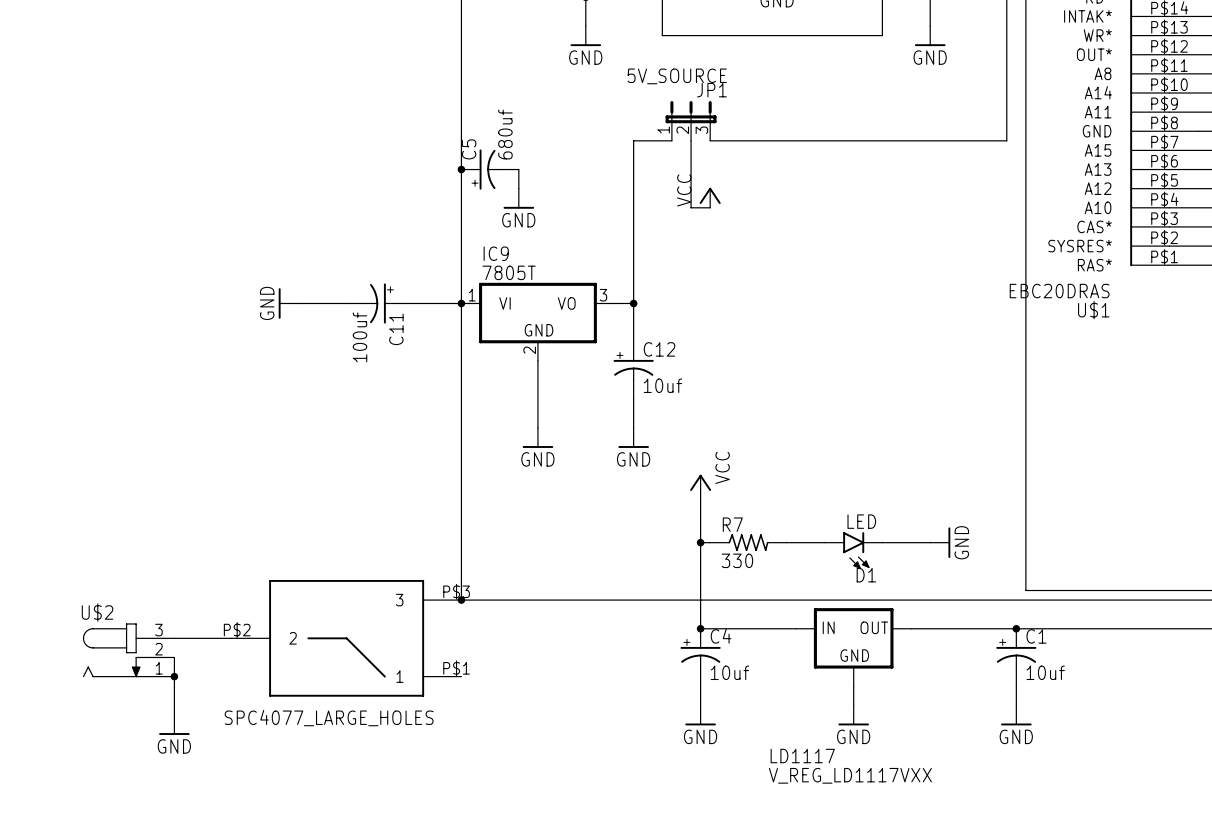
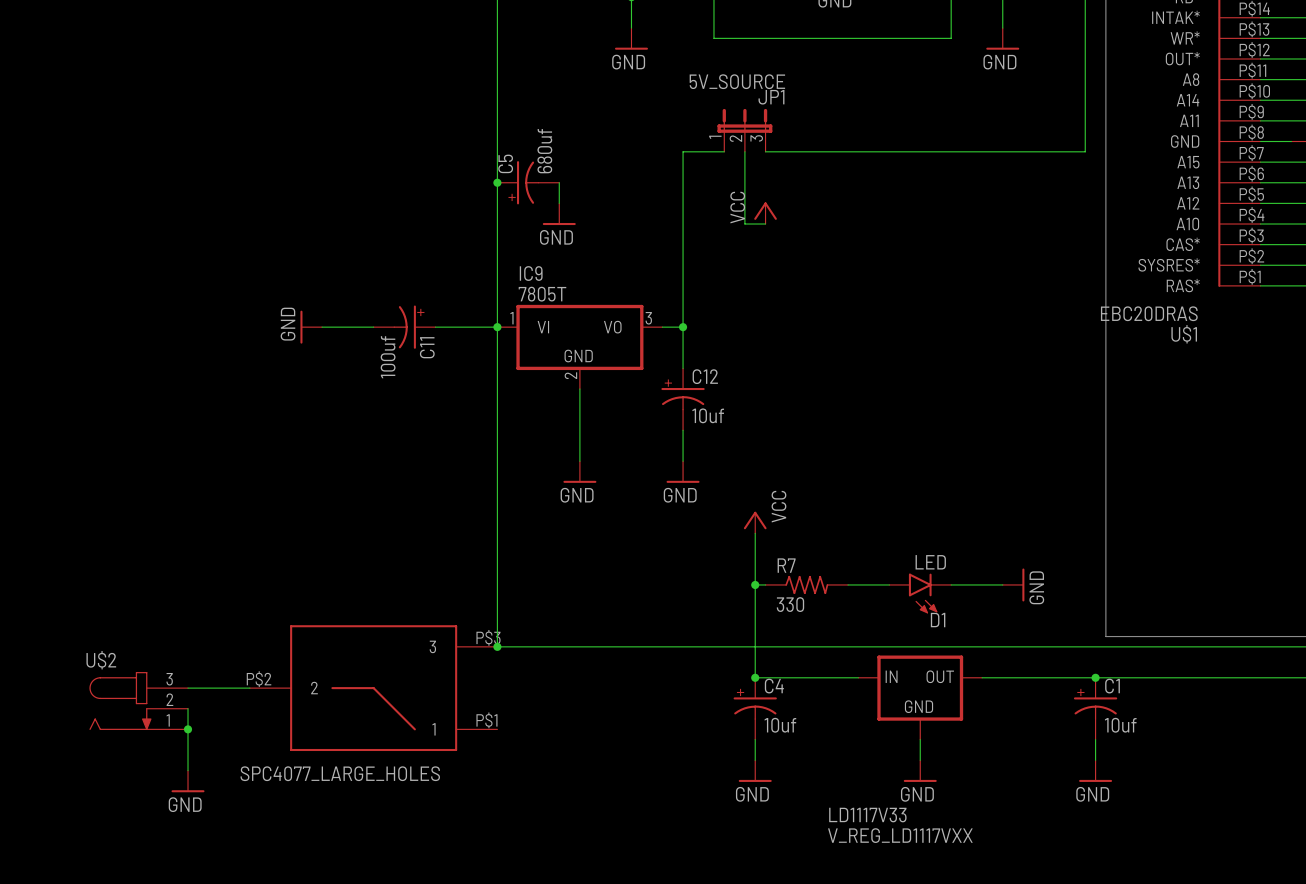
LD1117 name: LD1117 (802, 756) -> LD1117V33 (867, 815)

